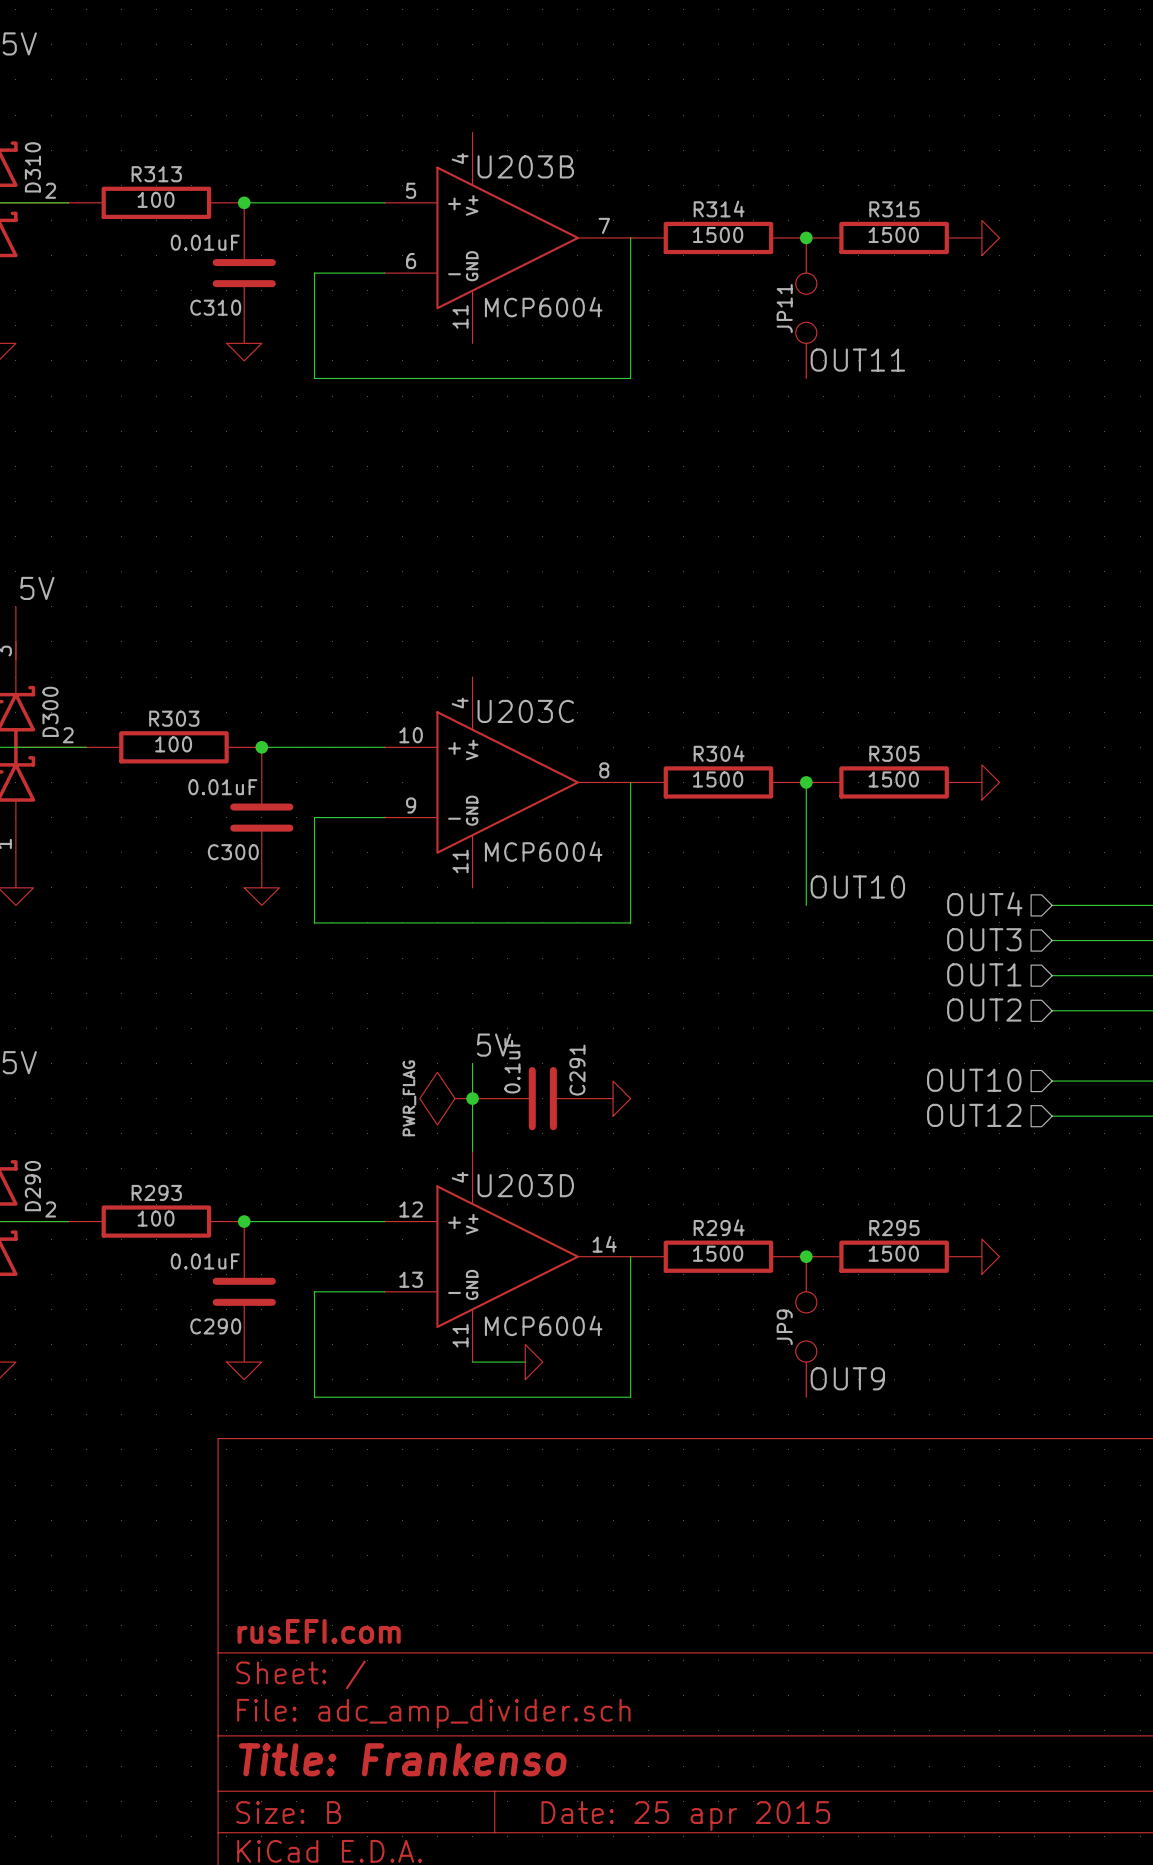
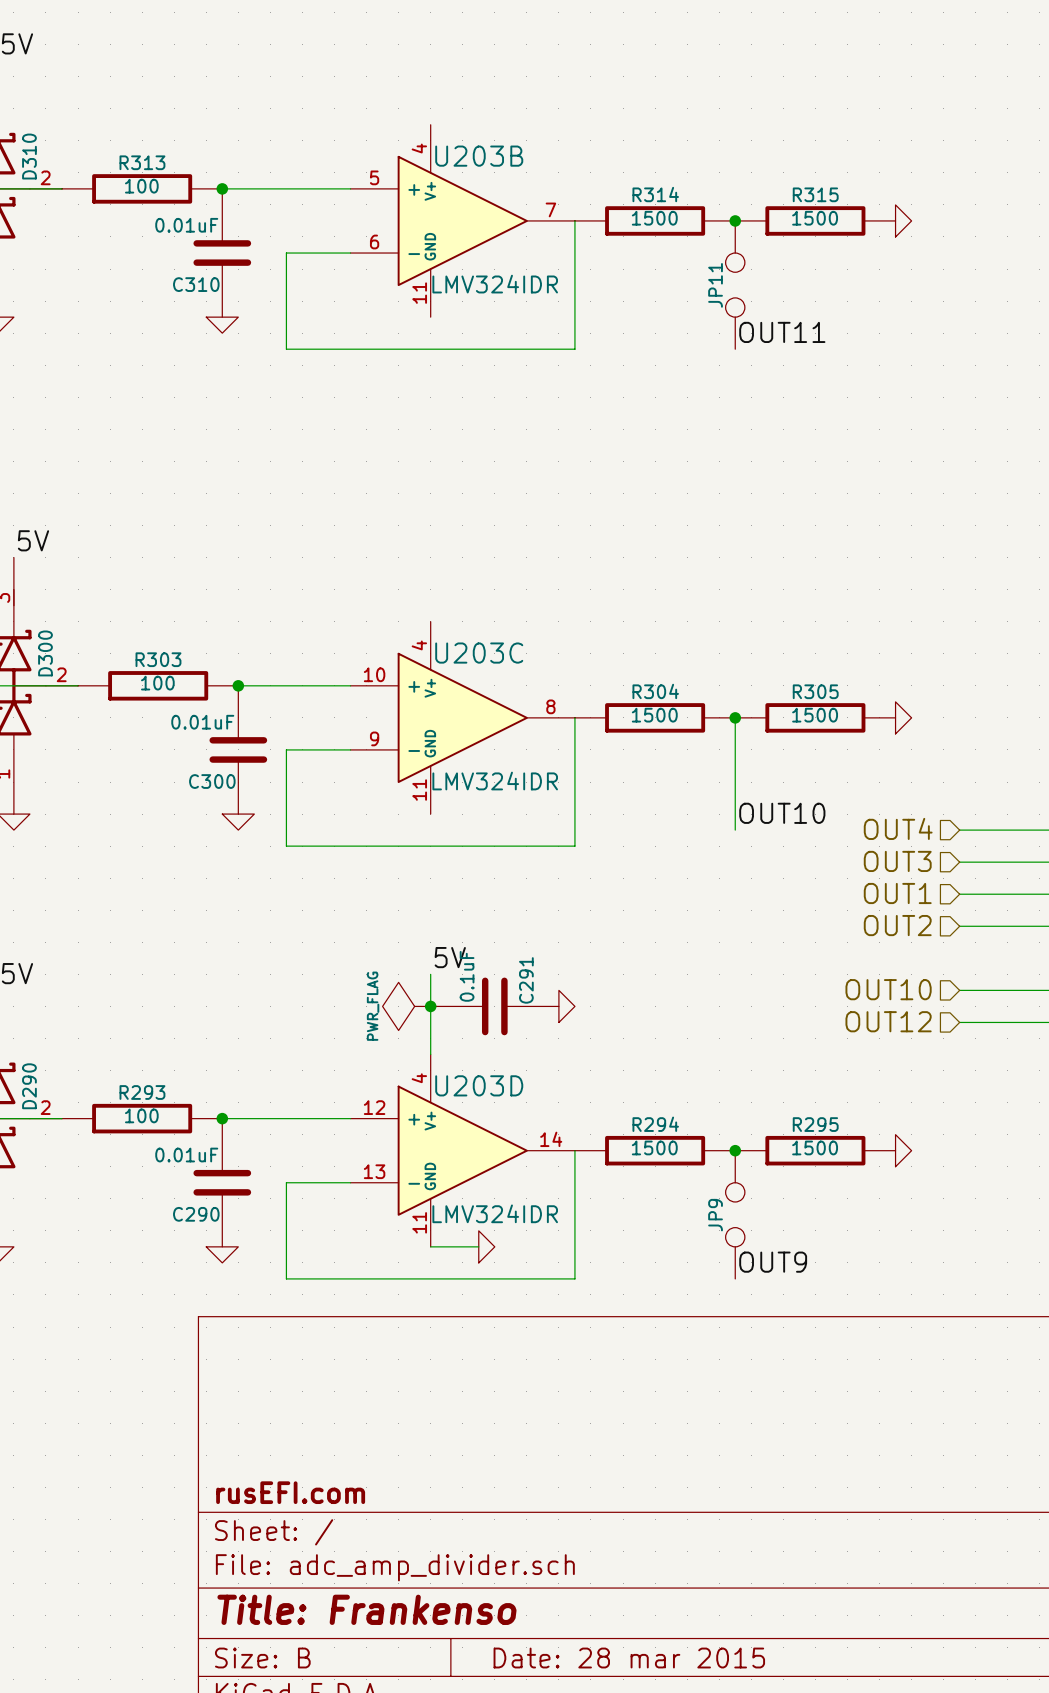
U203B value: MCP6004 (543, 307) -> LMV324IDR (495, 284)
U203C value: MCP6004 (543, 851) -> LMV324IDR (495, 781)
U203D value: MCP6004 (543, 1325) -> LMV324IDR (495, 1213)
title block: Date: 25 apr 2015 (685, 1816) -> Date: 28 mar 2015 (629, 1658)

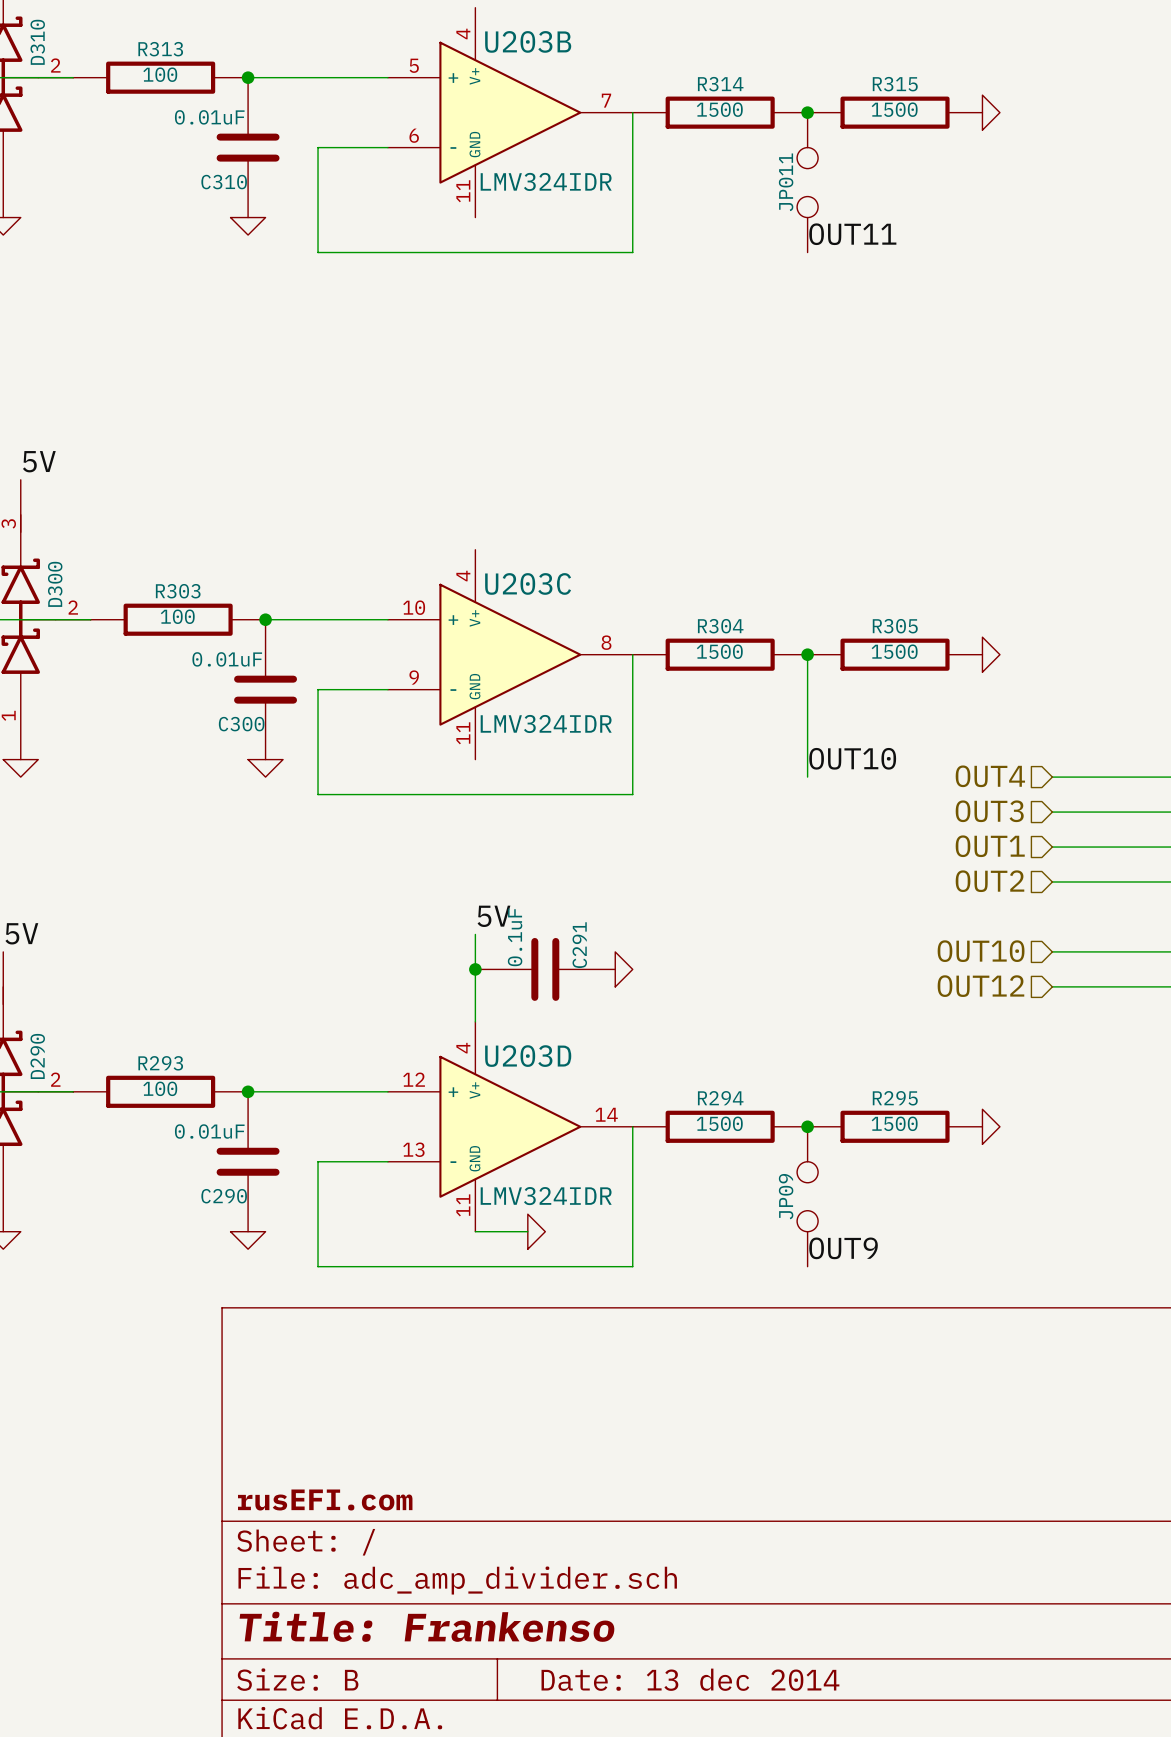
JP11 name: JP11 (715, 285) -> JP011 (786, 182)
power symbol: PWR_FLAG (406, 1006) -> none
JP9 name: JP9 (715, 1215) -> JP09 (786, 1196)
title block: Date: 28 mar 2015 (629, 1658) -> Date: 13 dec 2014 (690, 1679)

